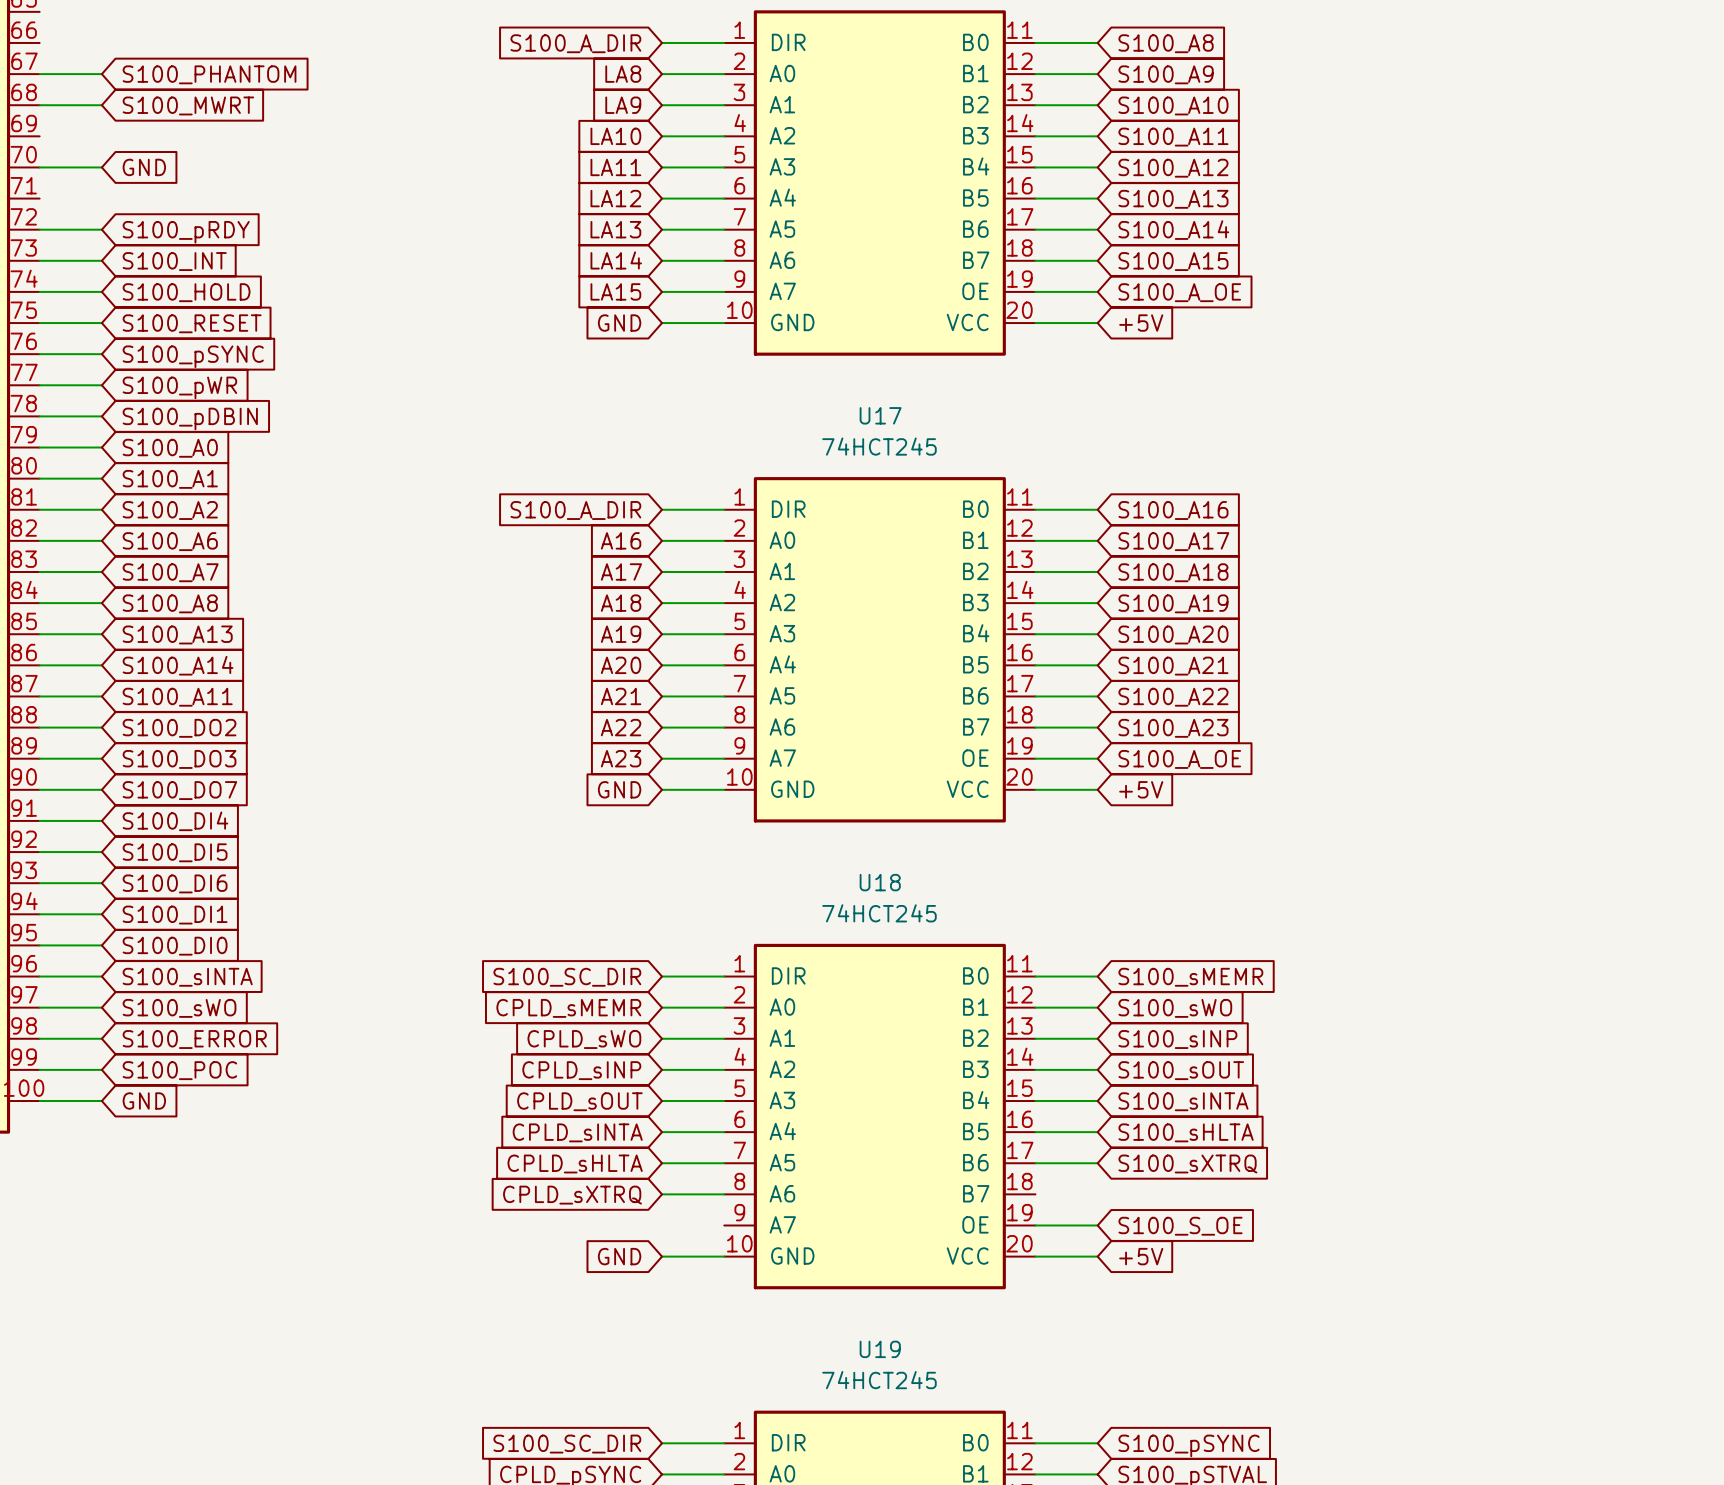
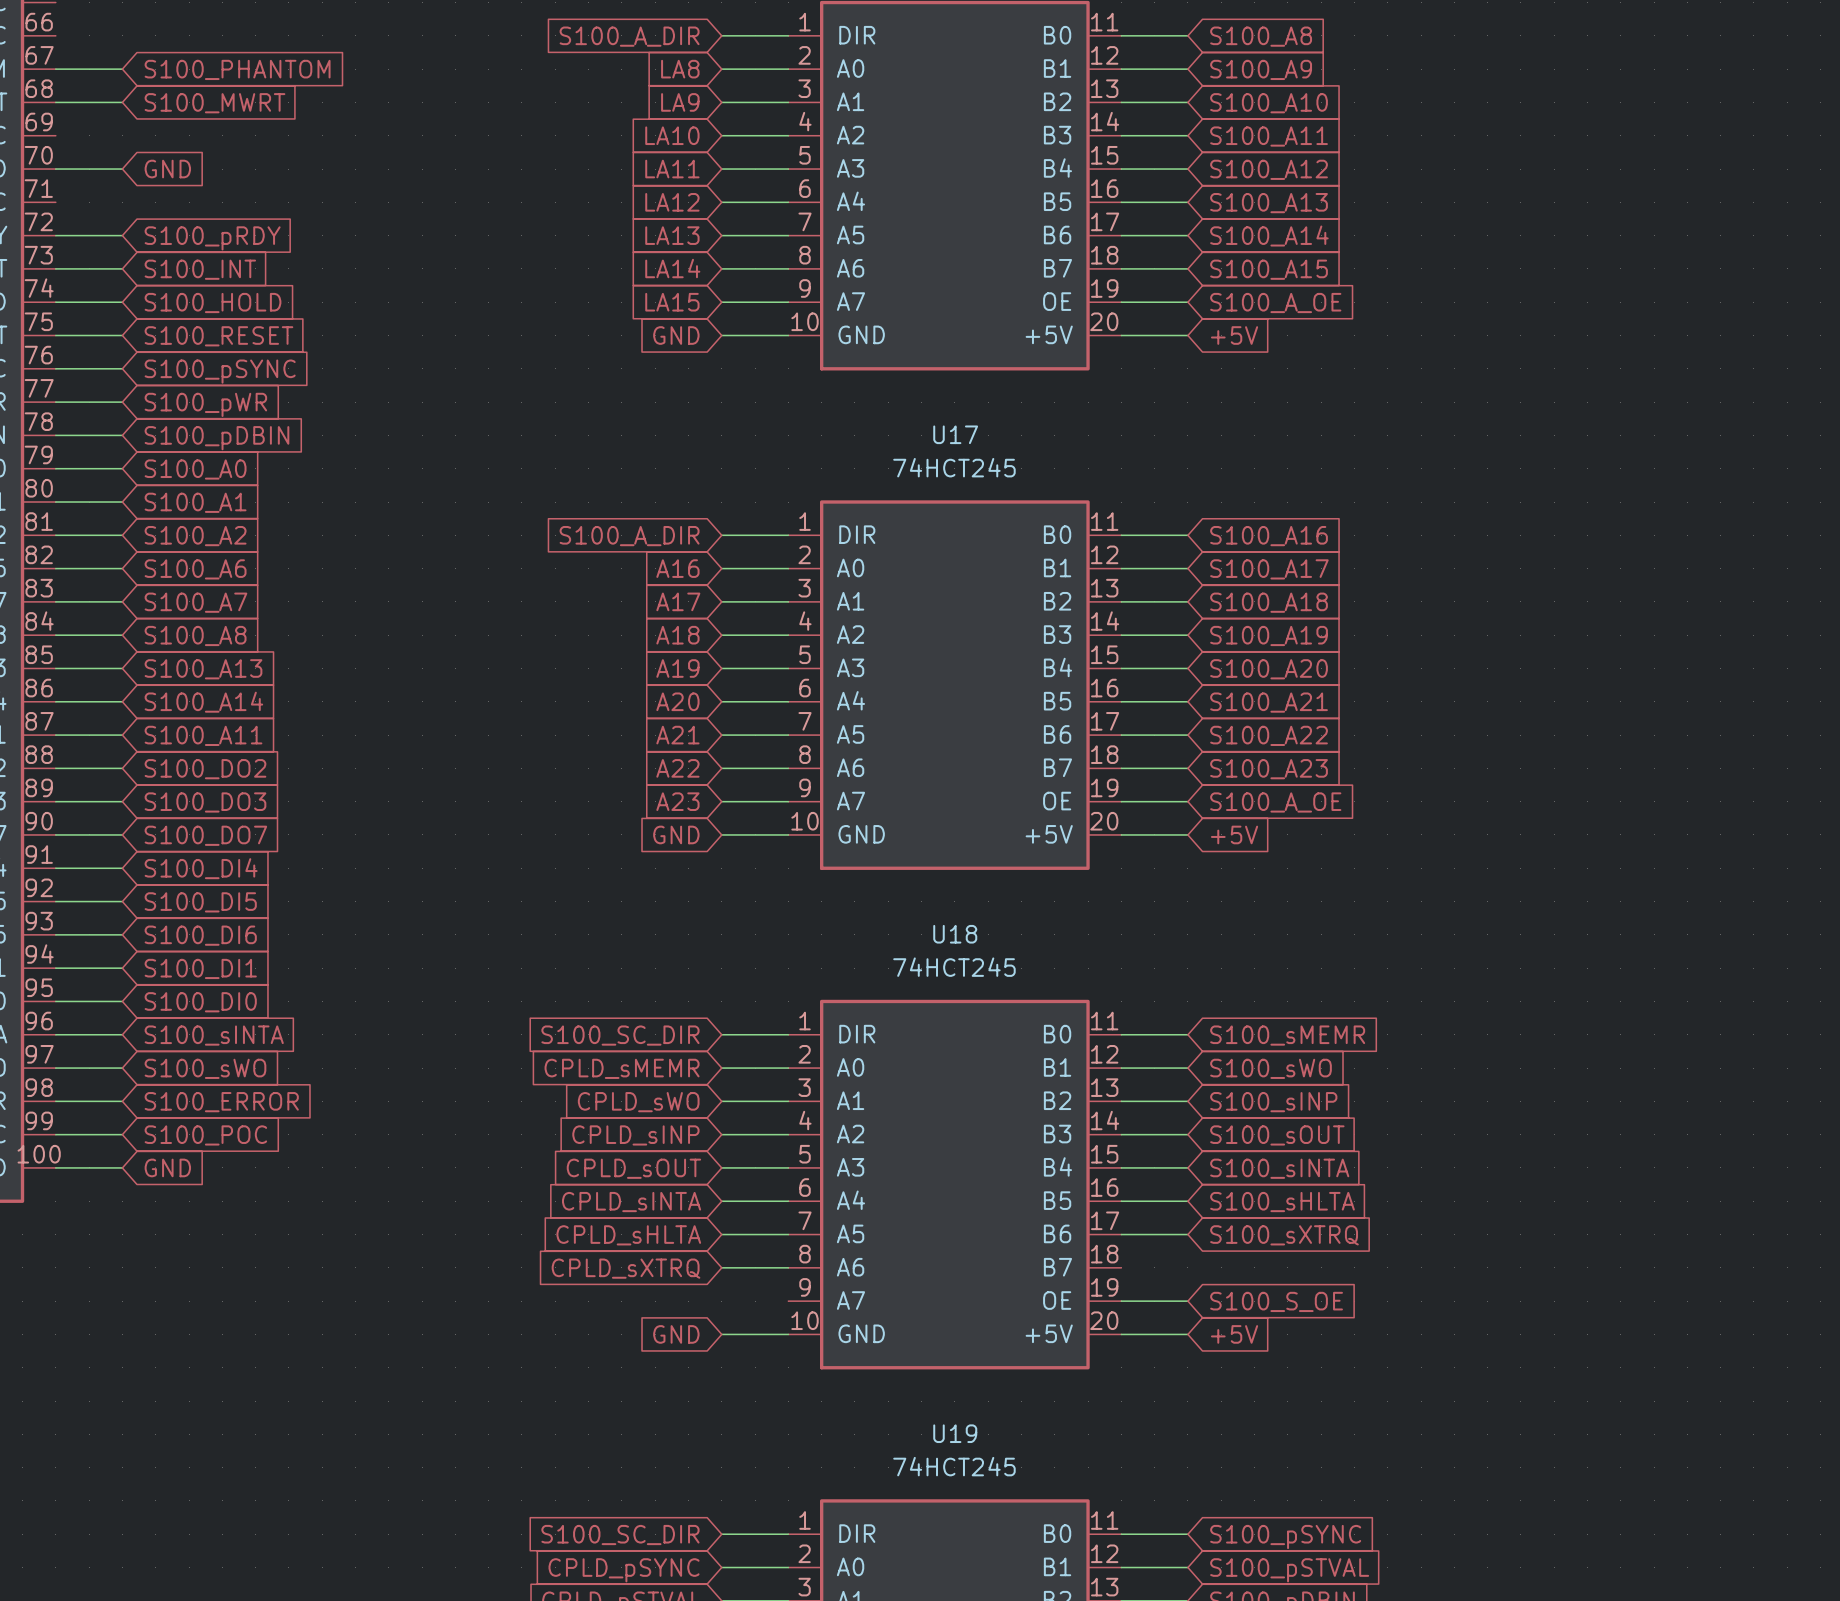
part pin name: VCC (967, 322) -> +5V (1049, 334)
U17 pin name: VCC (967, 789) -> +5V (1049, 834)
U18 pin name: VCC (967, 1256) -> +5V (1049, 1333)

